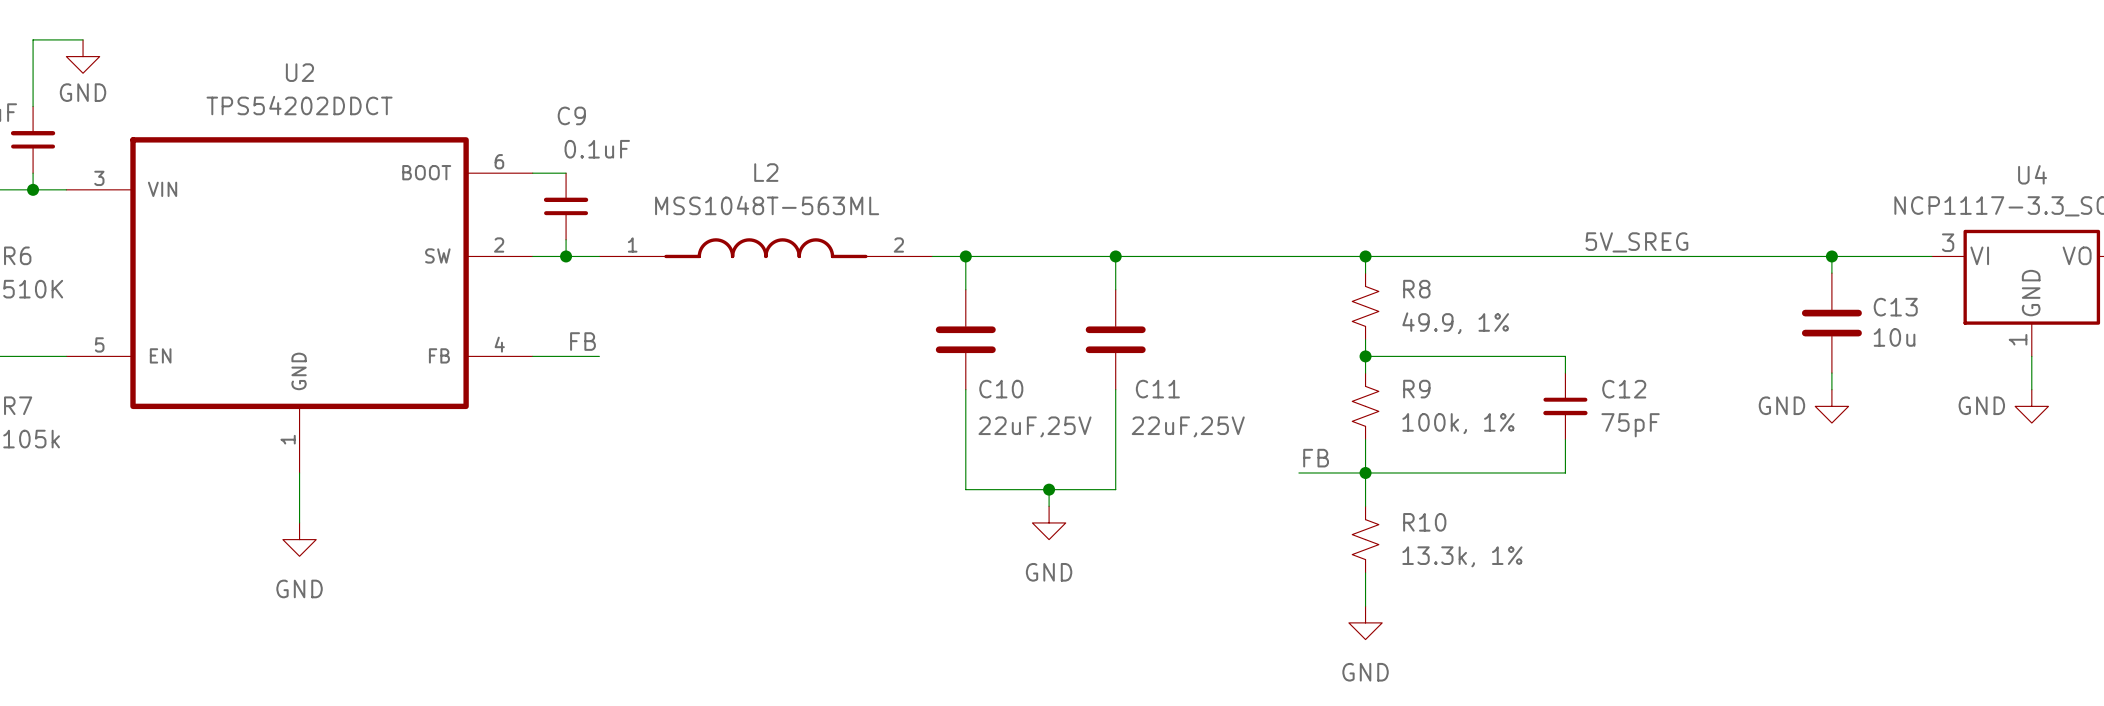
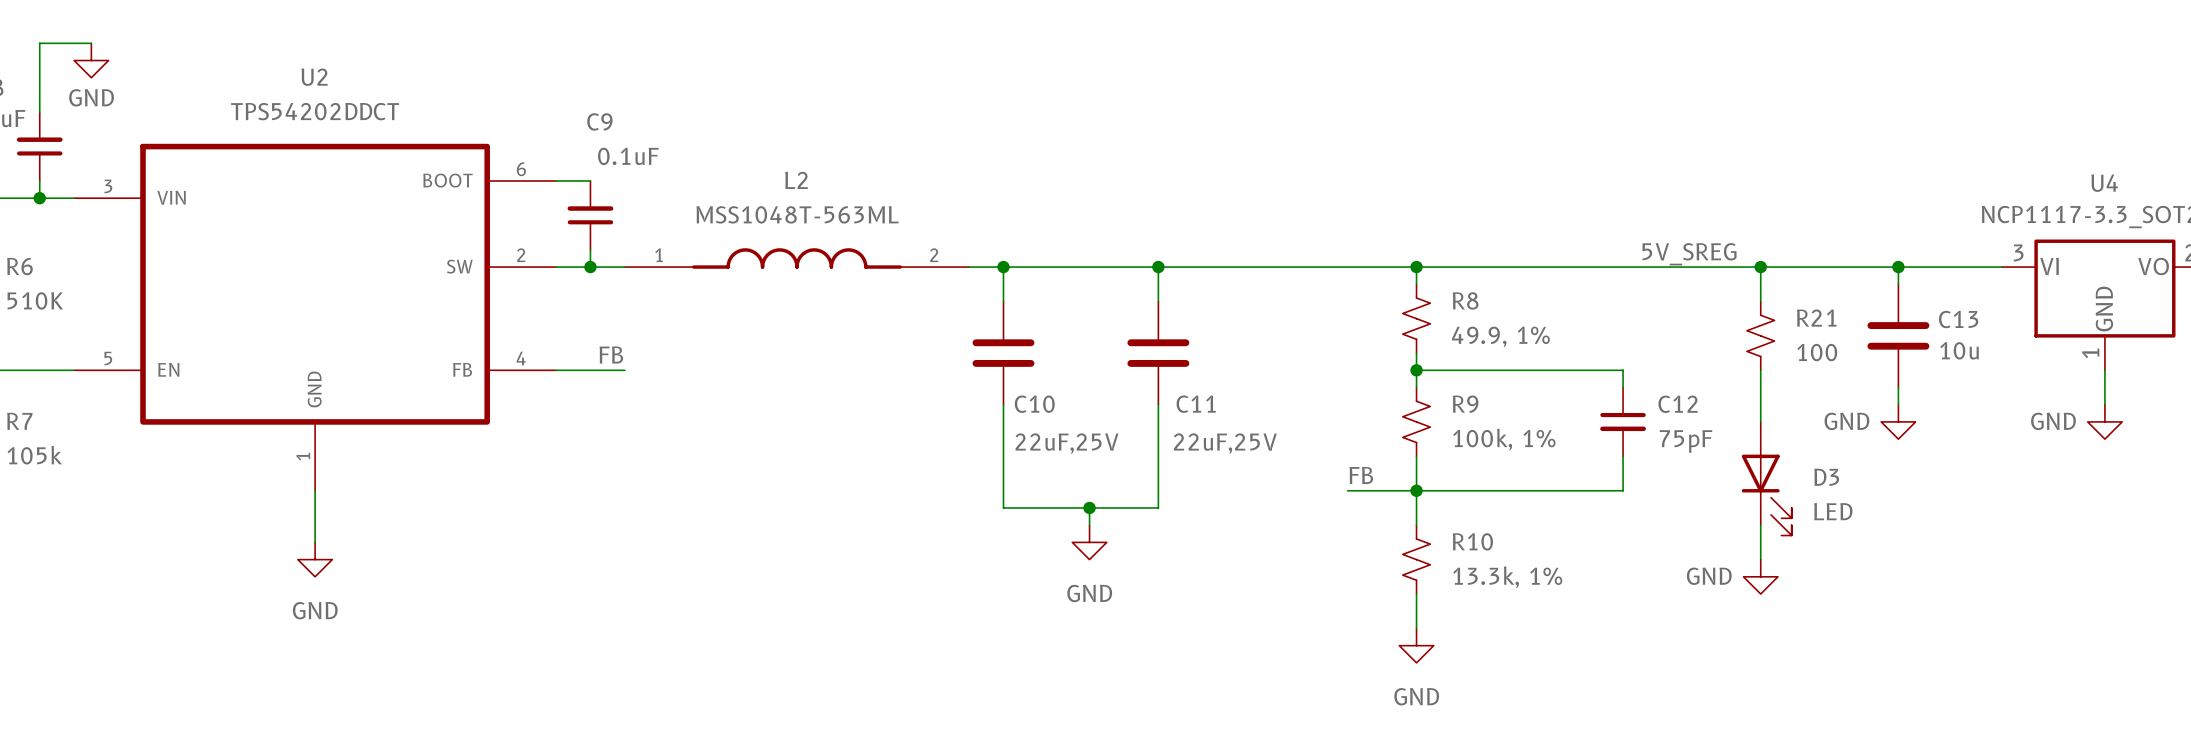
wire: none -> (1760, 267) (1760, 301)
junction: none -> (1760, 267)
R21: none -> 100 (1760, 335)
wire: none -> (1760, 370) (1760, 421)
D3: none -> LED (1766, 478)
wire: none -> (1760, 525) (1760, 559)
power symbol: none -> GND (1760, 576)

